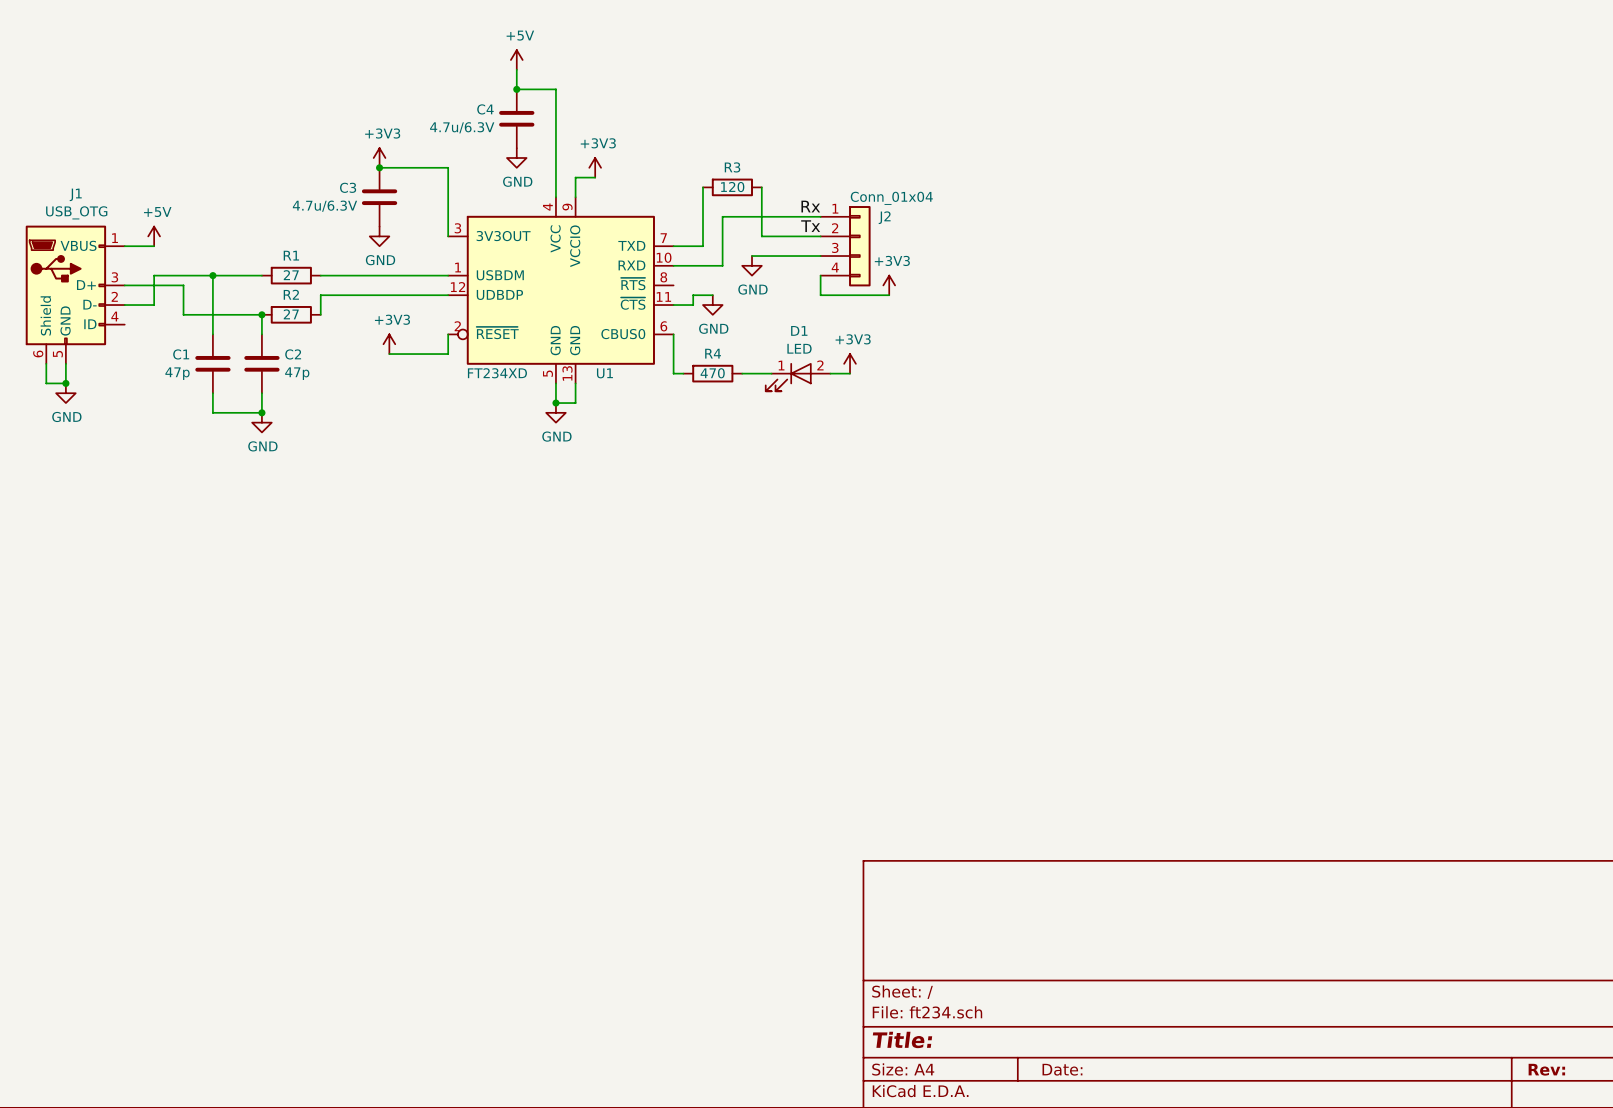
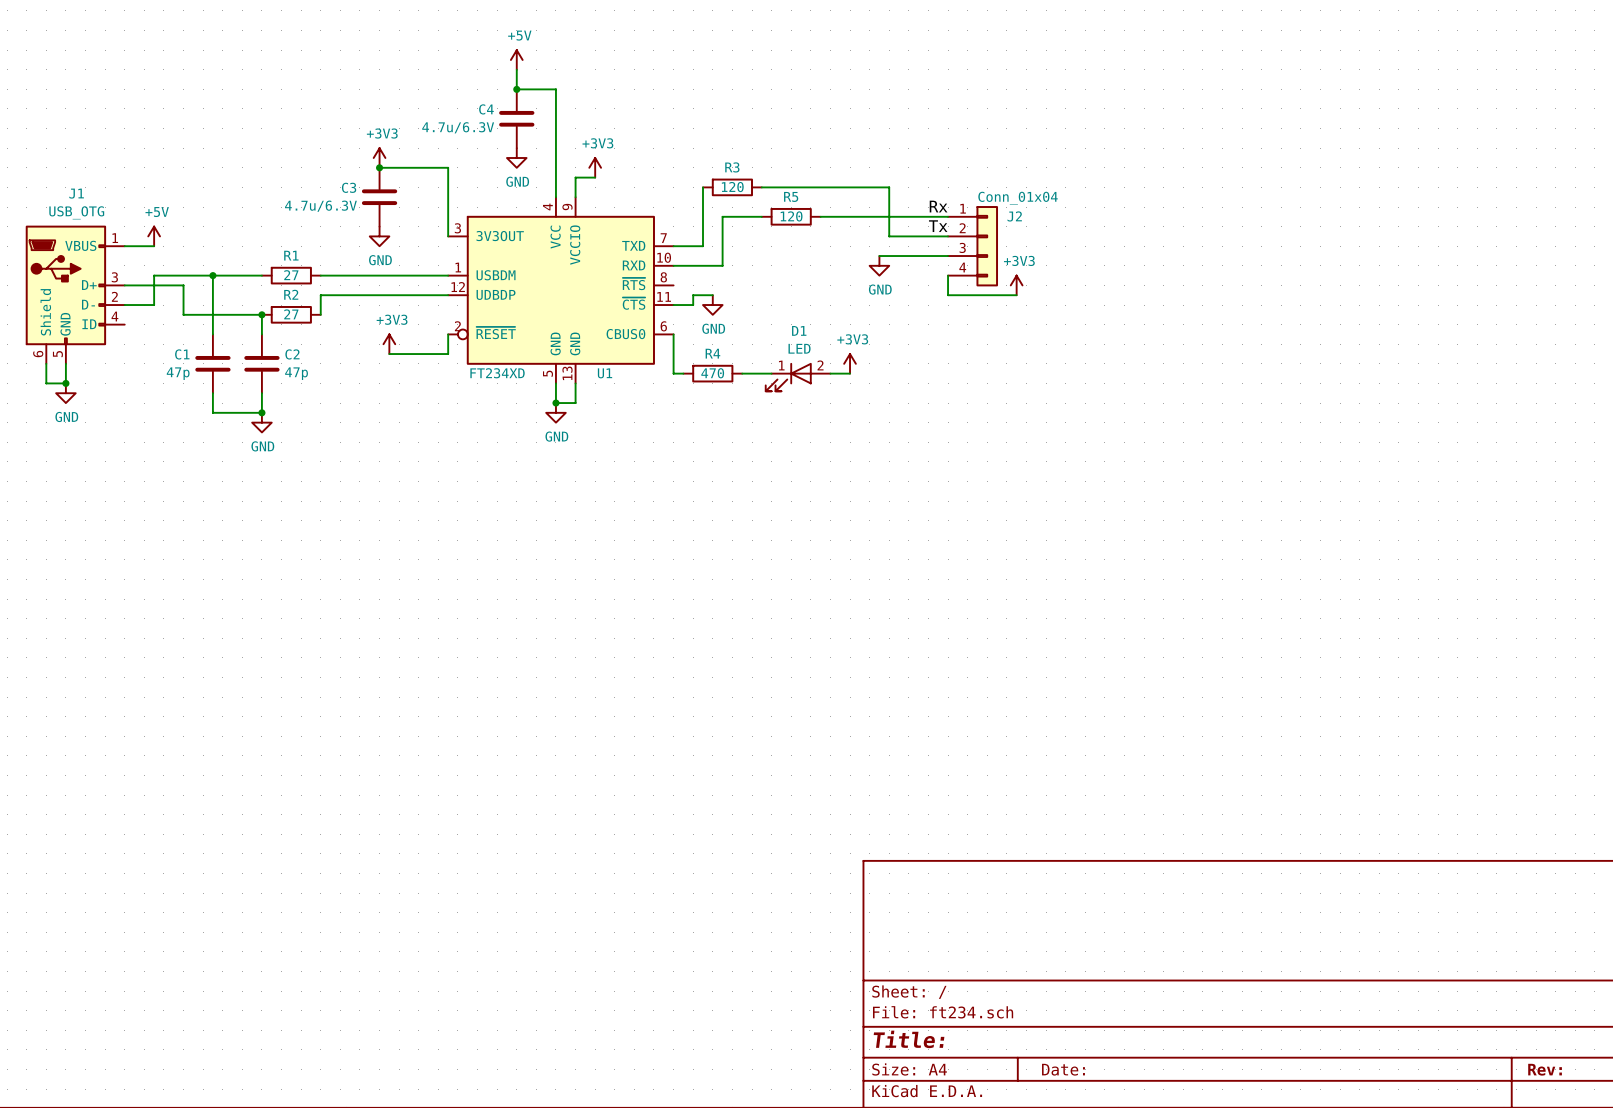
wire: (761, 187) (761, 236) (820, 236) -> (761, 187) (889, 187) (889, 236) (948, 236)
label position: Rx (810, 206) -> Rx (938, 206)
wire: (761, 216) (820, 216) -> (948, 216) (820, 216)
R5: none -> 120 (791, 216)
label position: Tx (810, 226) -> Tx (938, 226)
J2 position: (845, 246) -> (973, 246)
wire: (752, 256) (820, 256) -> (879, 256) (948, 256)
power symbol position: GND (752, 265) -> GND (879, 265)
wire: (820, 275) (820, 295) (889, 295) -> (948, 275) (948, 295) (1016, 295)
power symbol position: +3V3 (889, 285) -> +3V3 (1016, 285)

